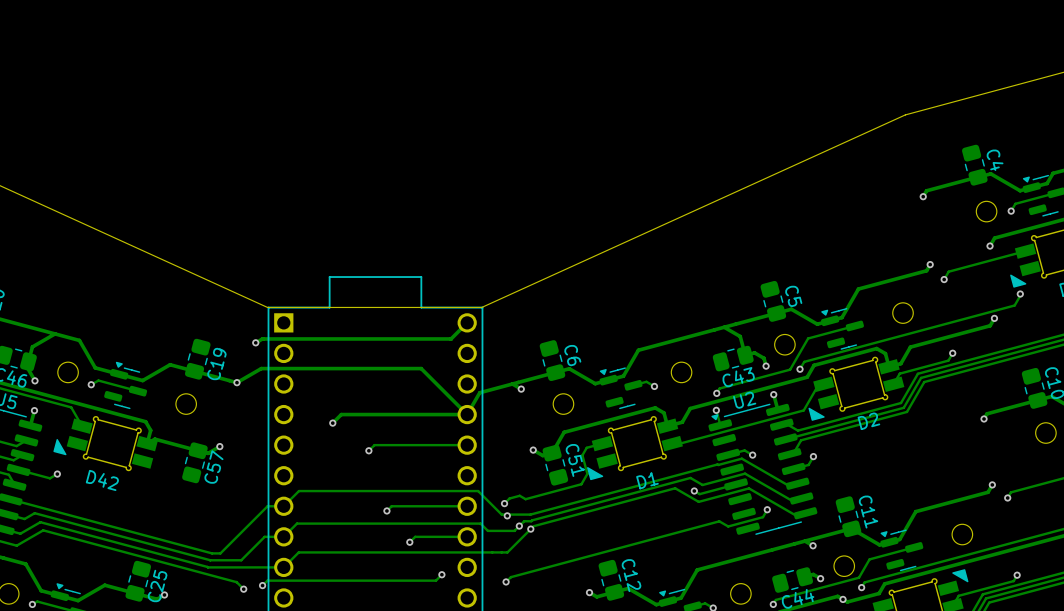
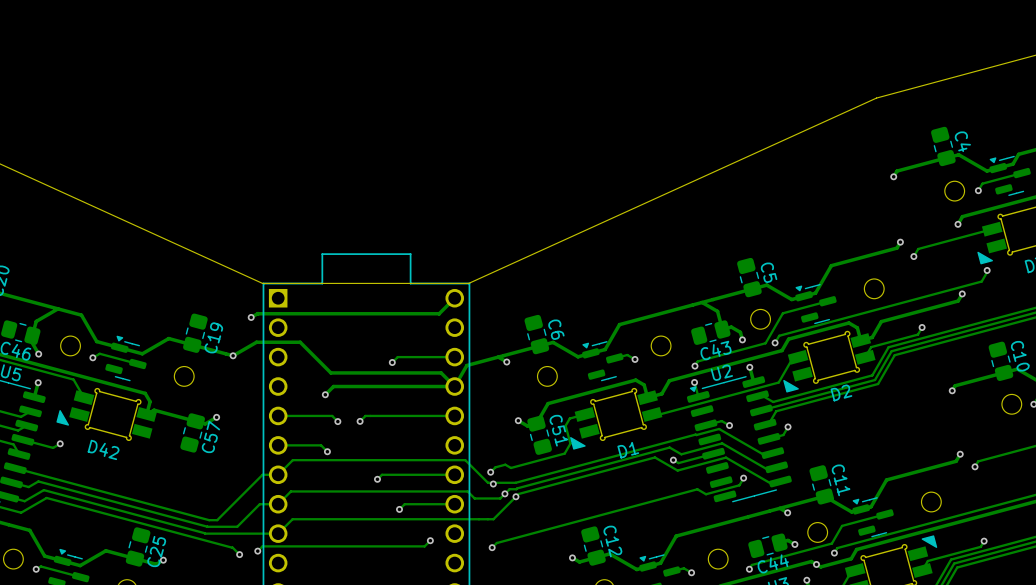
track: (306, 368) (421, 368) (453, 400) -> (300, 342) (330, 372) (441, 372)
track: none -> (454, 357) (397, 357) (392, 362)
via: none -> (392, 362)
track: none -> (278, 415) (332, 415) (337, 421)
via: none -> (337, 421)
track: none -> (278, 445) (321, 445) (327, 451)
via: none -> (327, 451)

